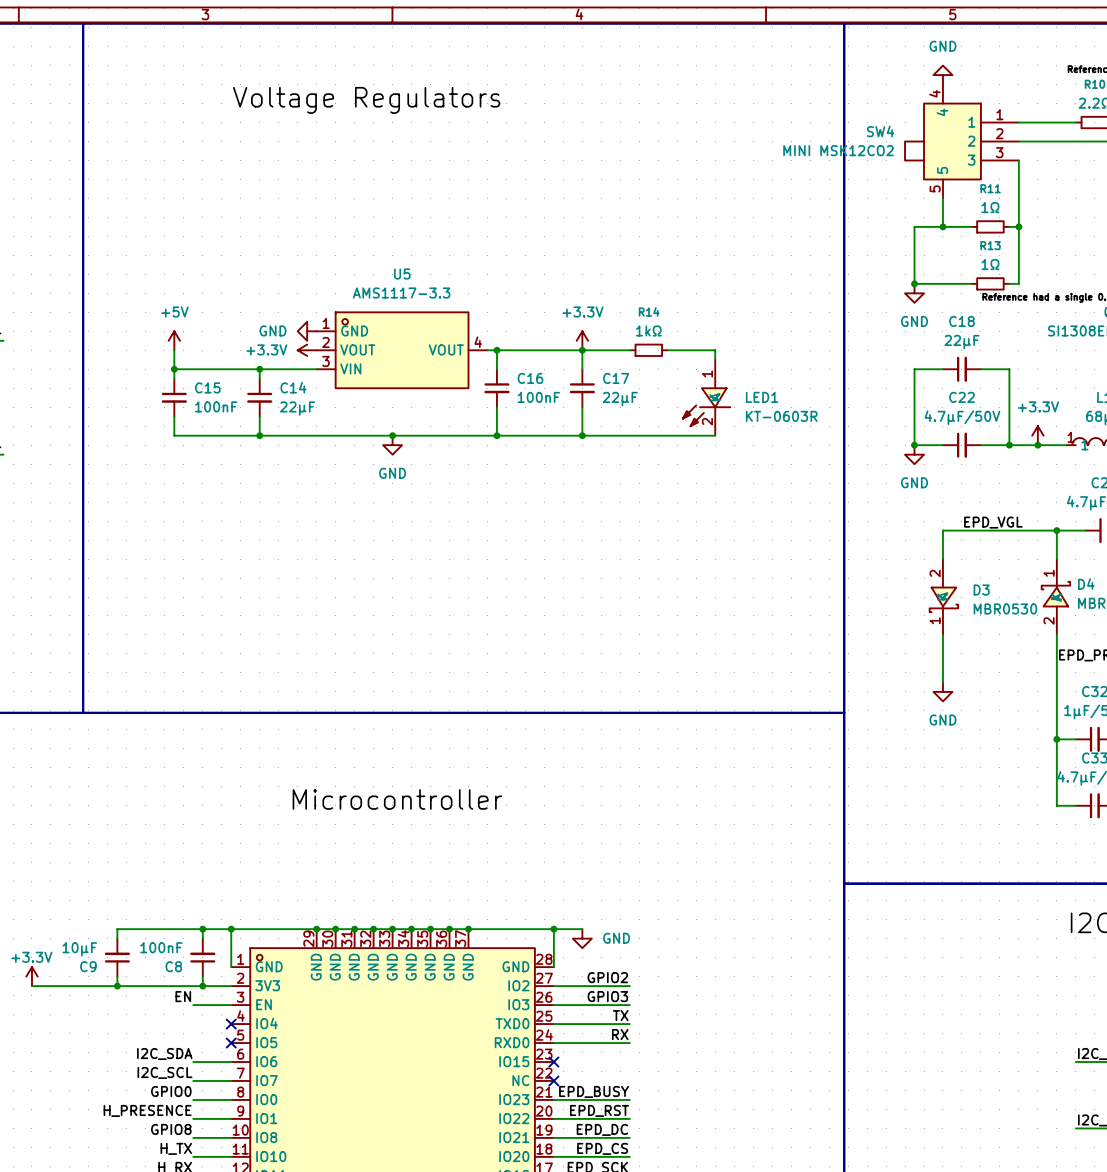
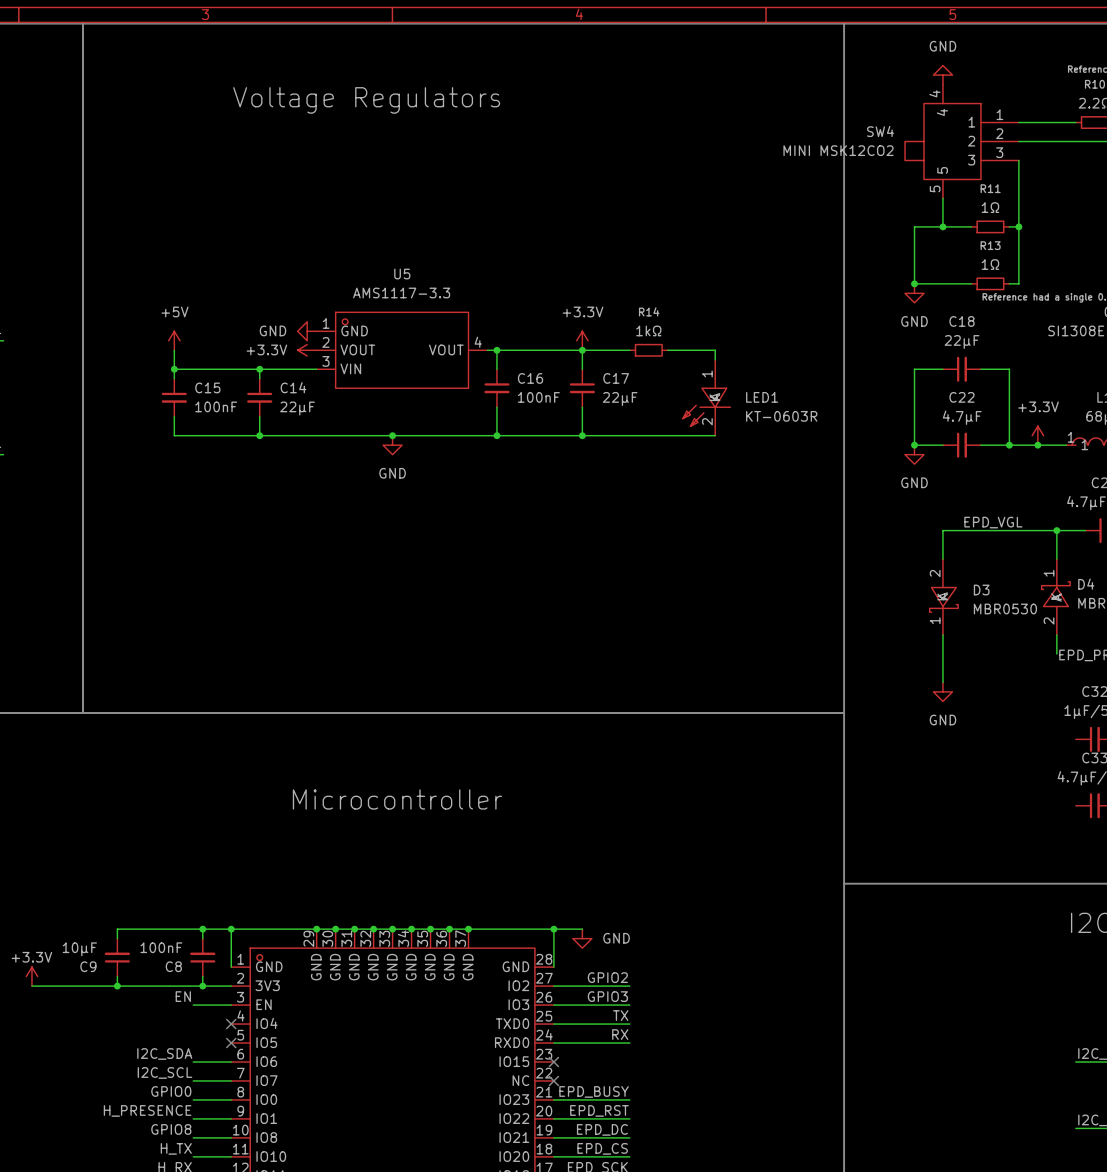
C22 value: 4.7μF/50V (962, 417) -> 4.7μF (962, 417)
wire: (1056, 653) (1056, 805) (1075, 805) -> none
wire: (1056, 739) (1075, 739) -> none
junction: (1056, 739) -> none

